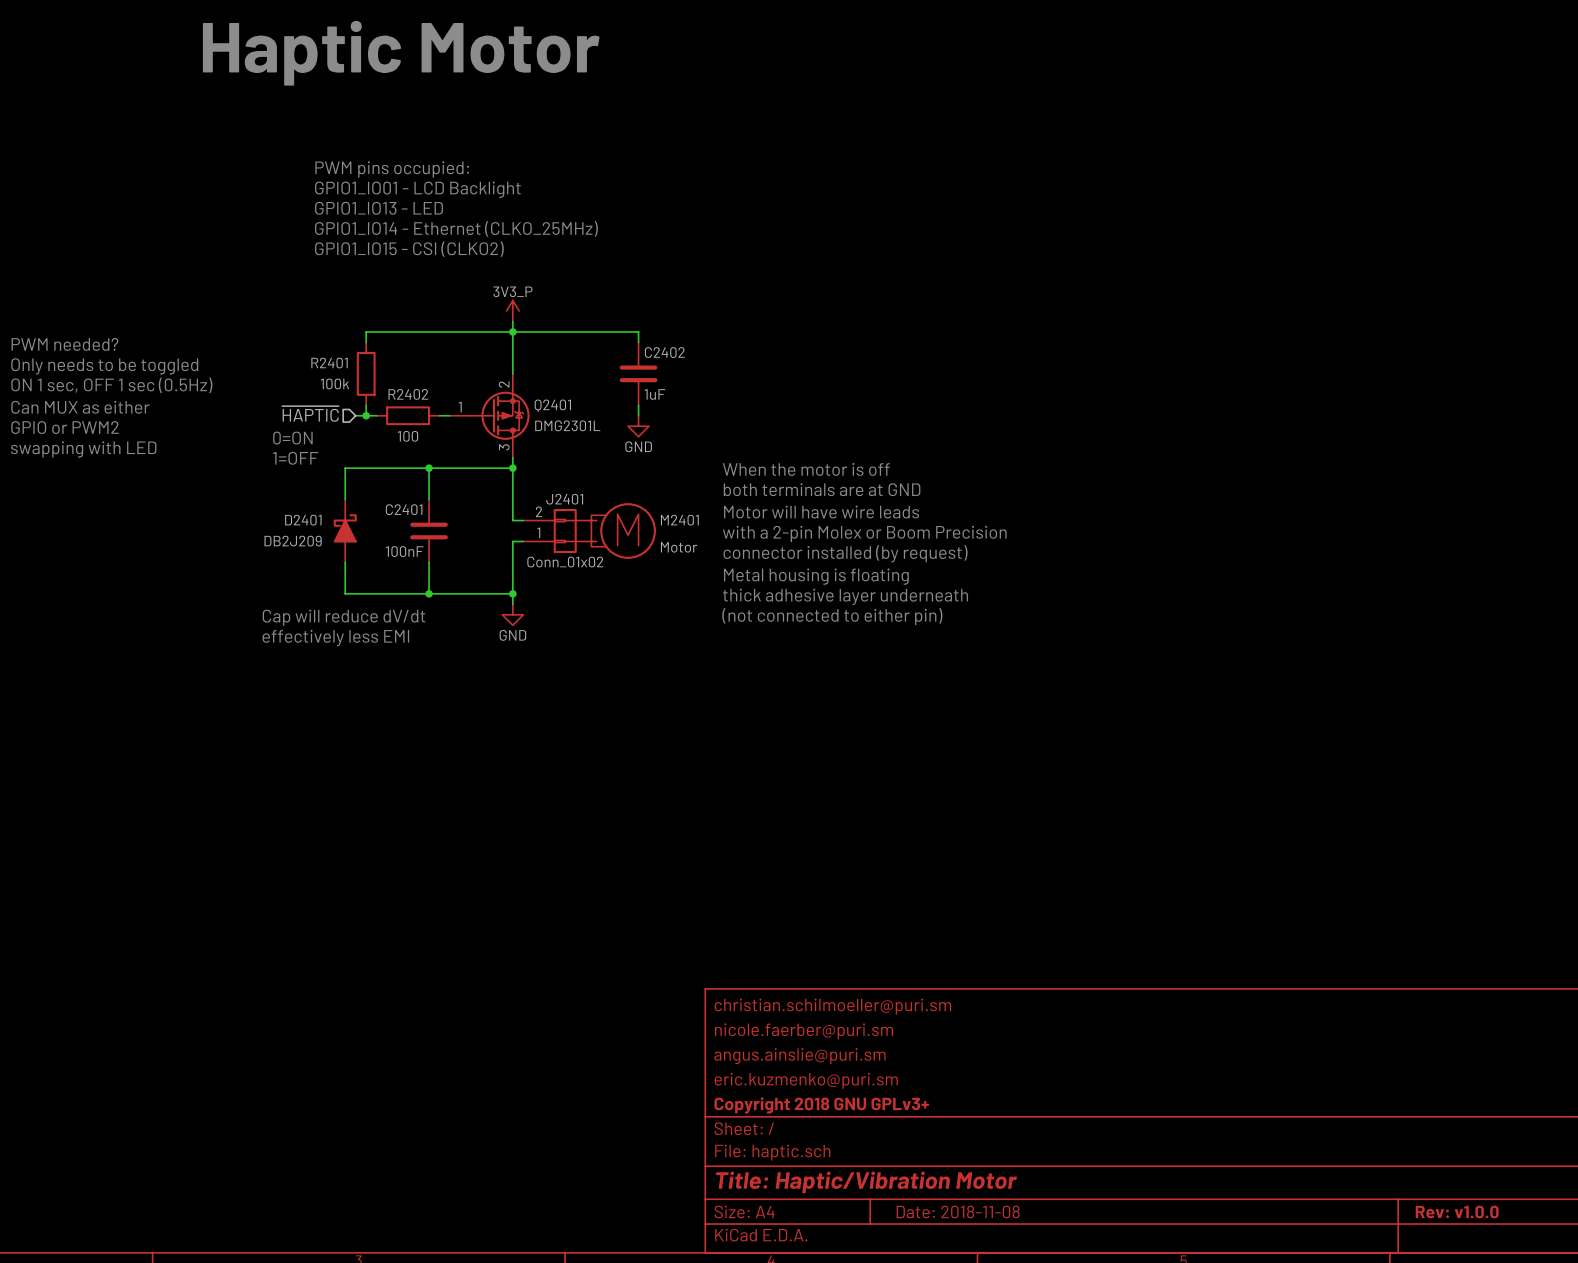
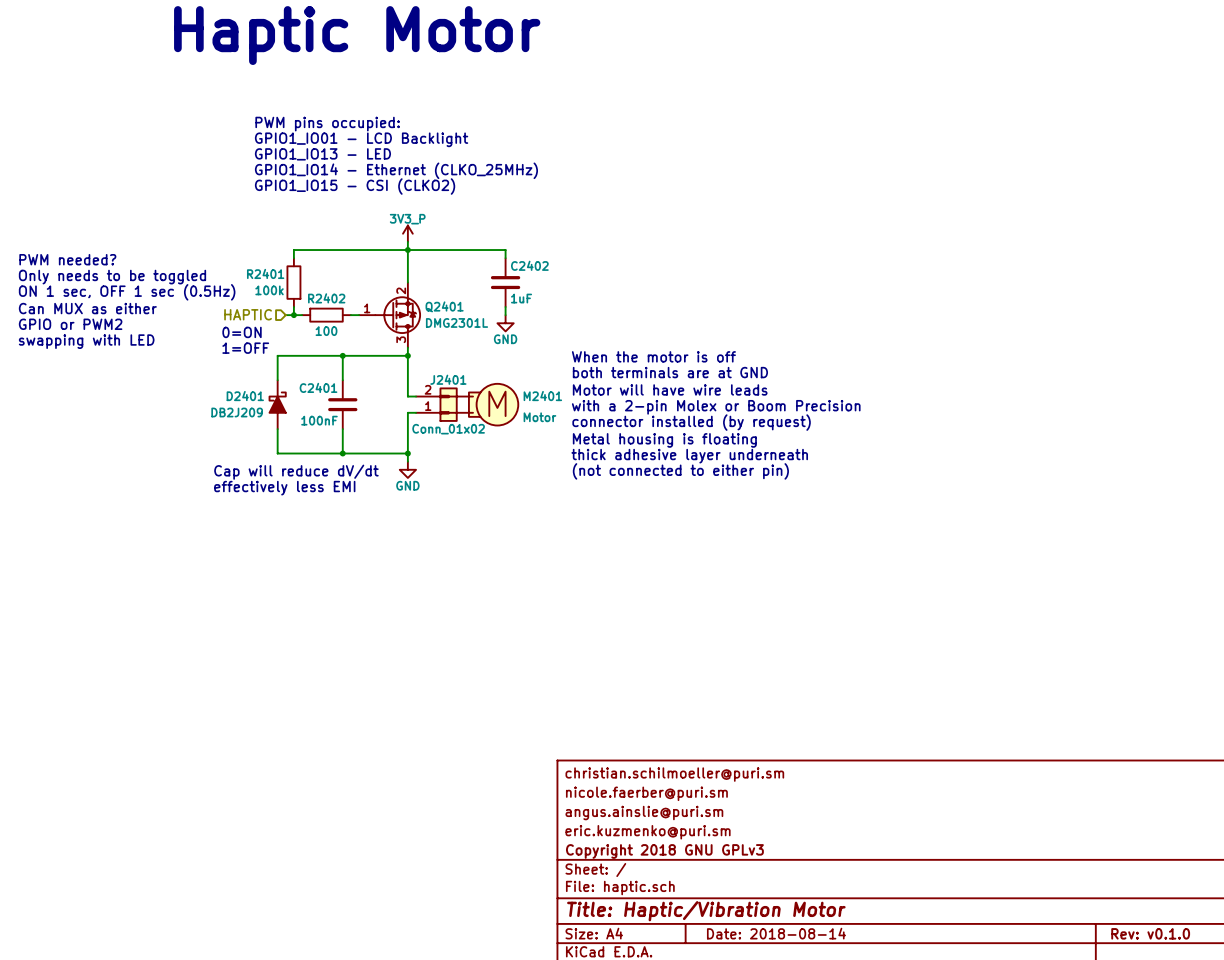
hierarchical label: ~{HAPTIC} (310, 413) -> HAPTIC (248, 314)
title block: Copyright 2018 GNU GPLv3+ (821, 1105) -> Copyright 2018 GNU GPLv3 (664, 851)
title block: Date: 2018-11-08 (958, 1212) -> Date: 2018-08-14 (776, 933)
title block: Rev: v1.0.0 (1457, 1212) -> Rev: v0.1.0 (1150, 933)

